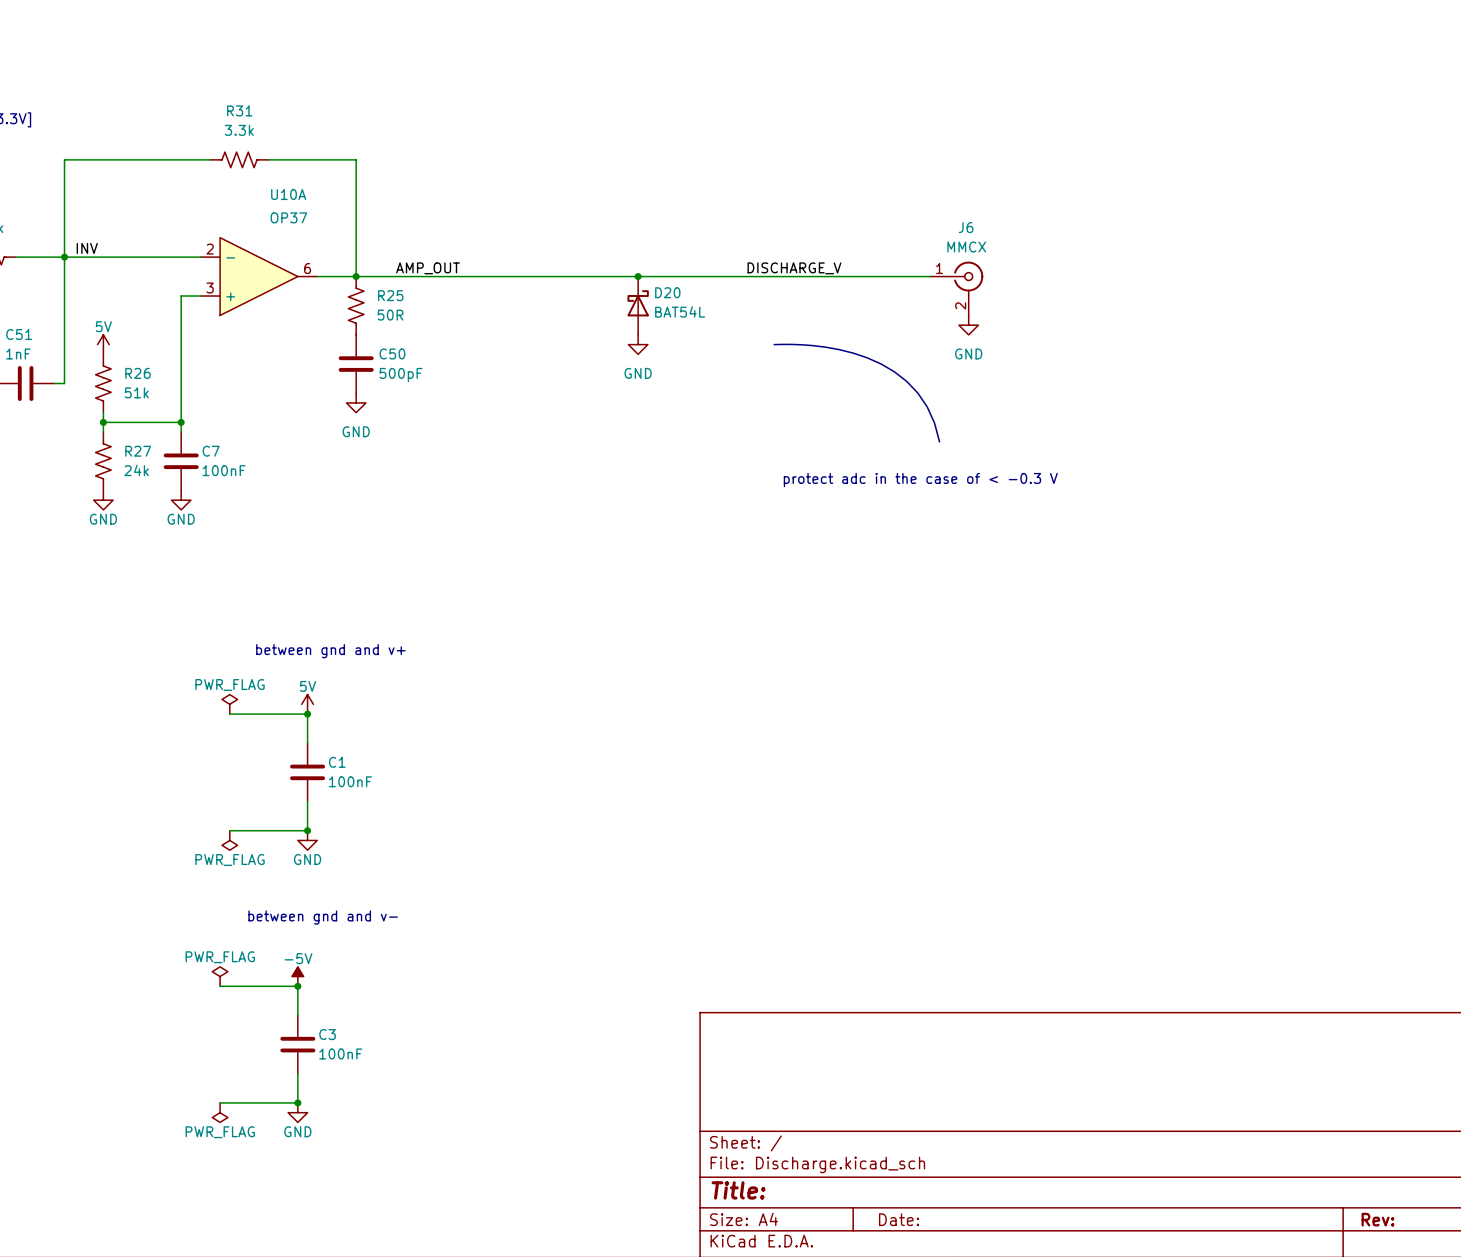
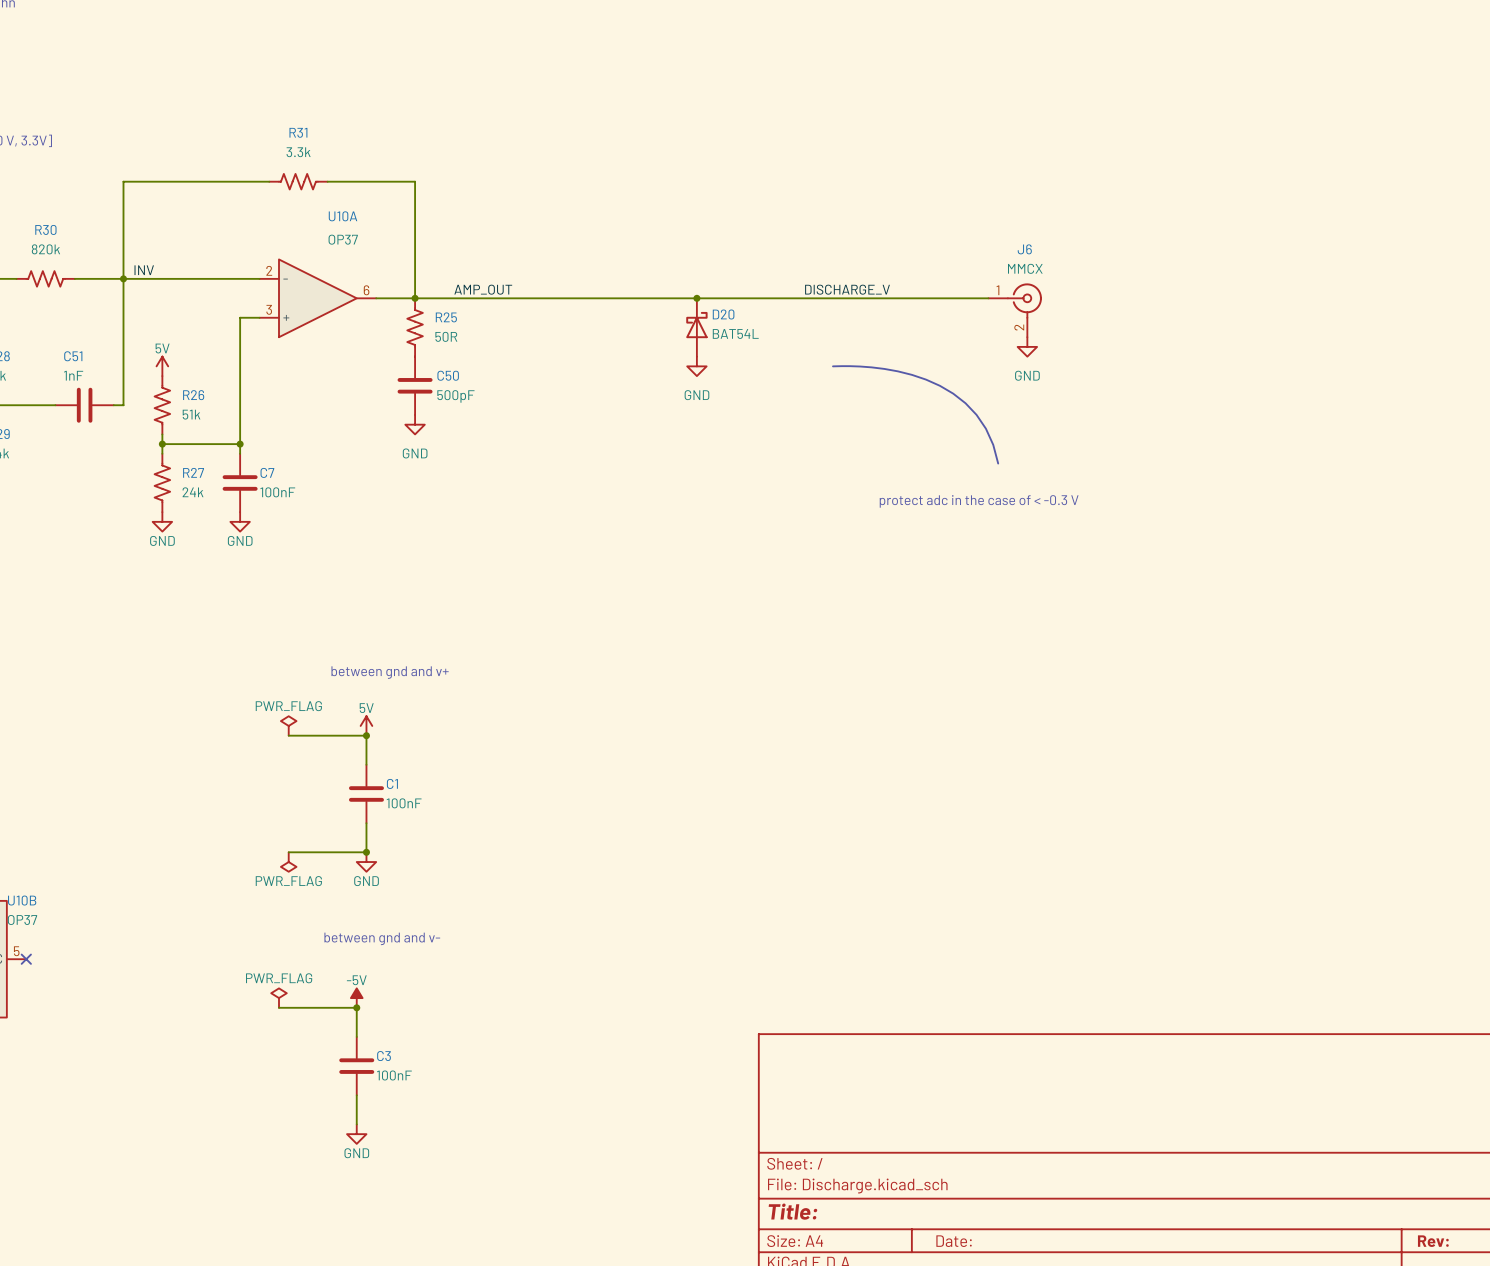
wire: (220, 1102) (297, 1102) -> none
junction: (297, 1102) -> none
power symbol: PWR_FLAG (220, 1112) -> none

